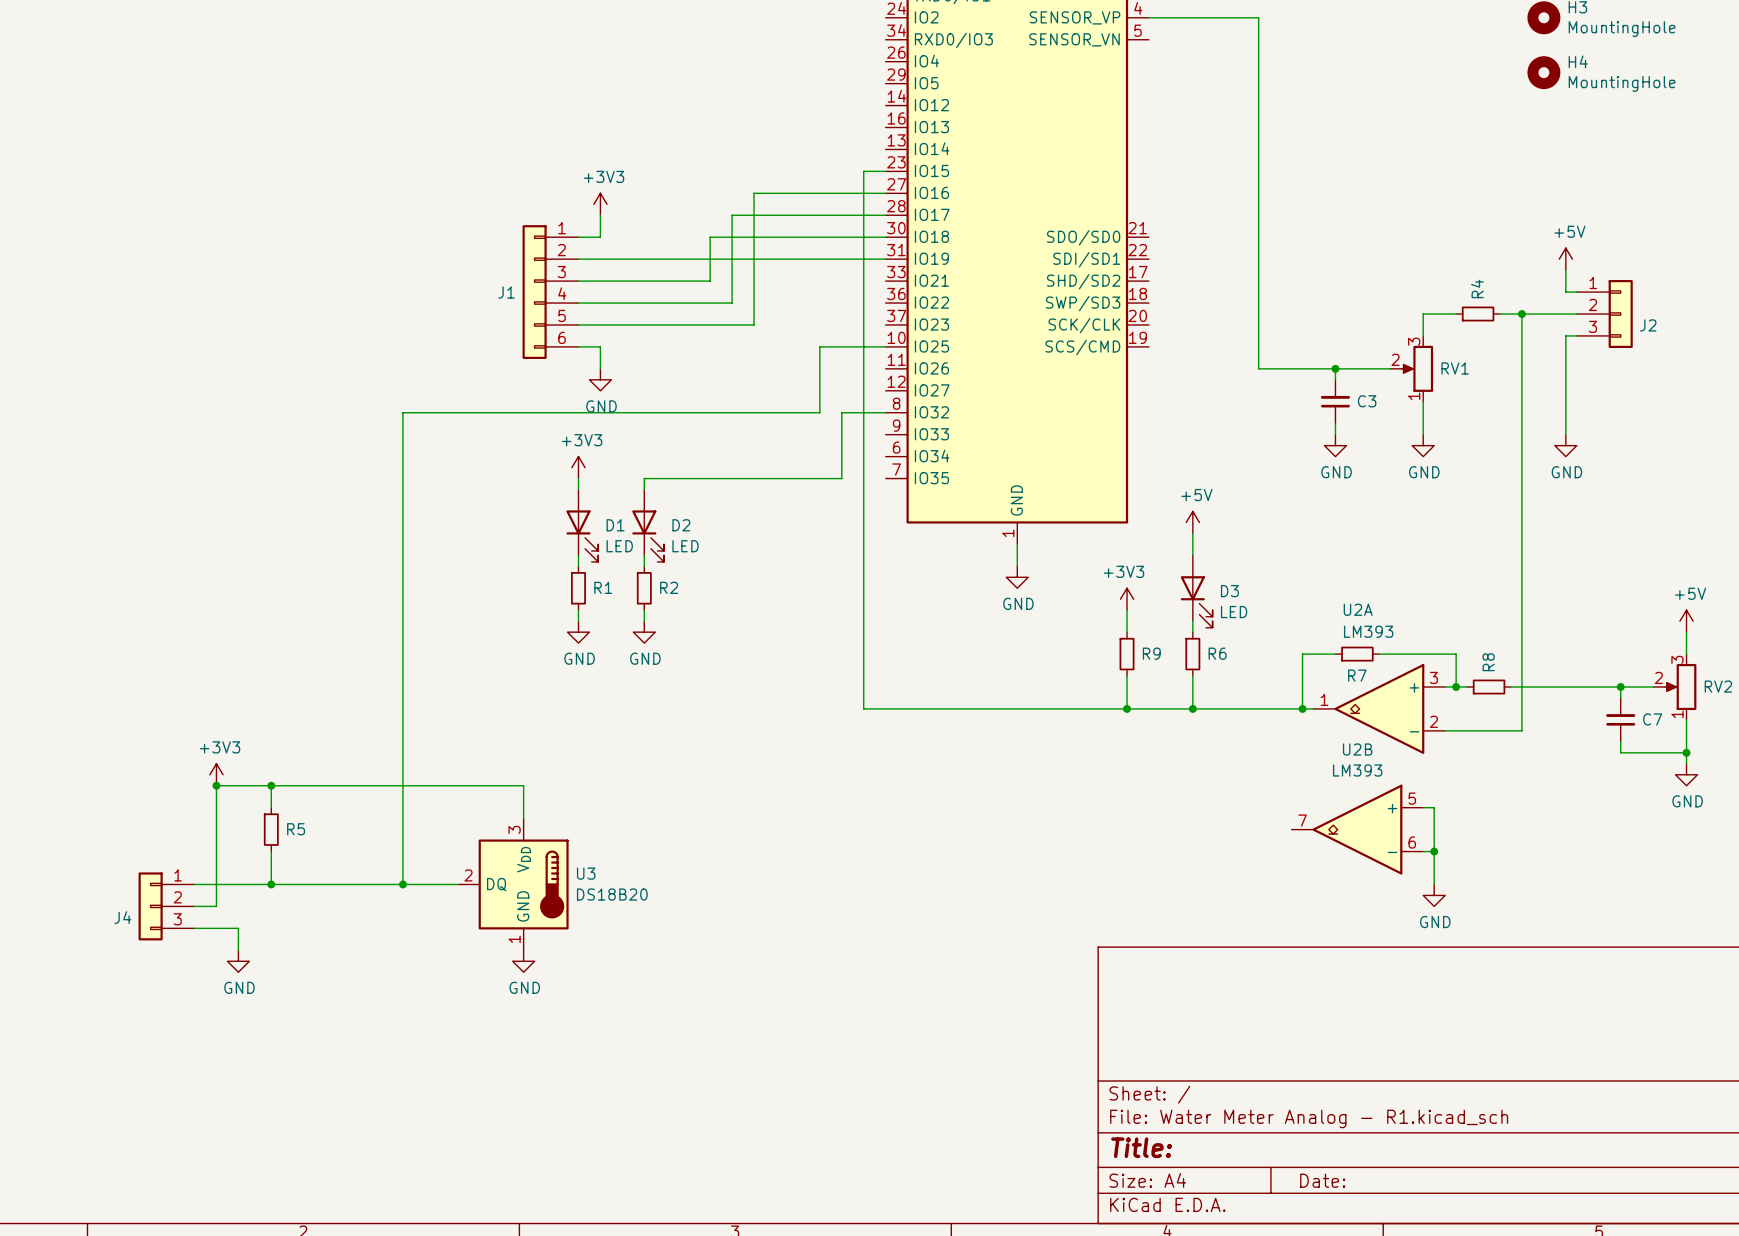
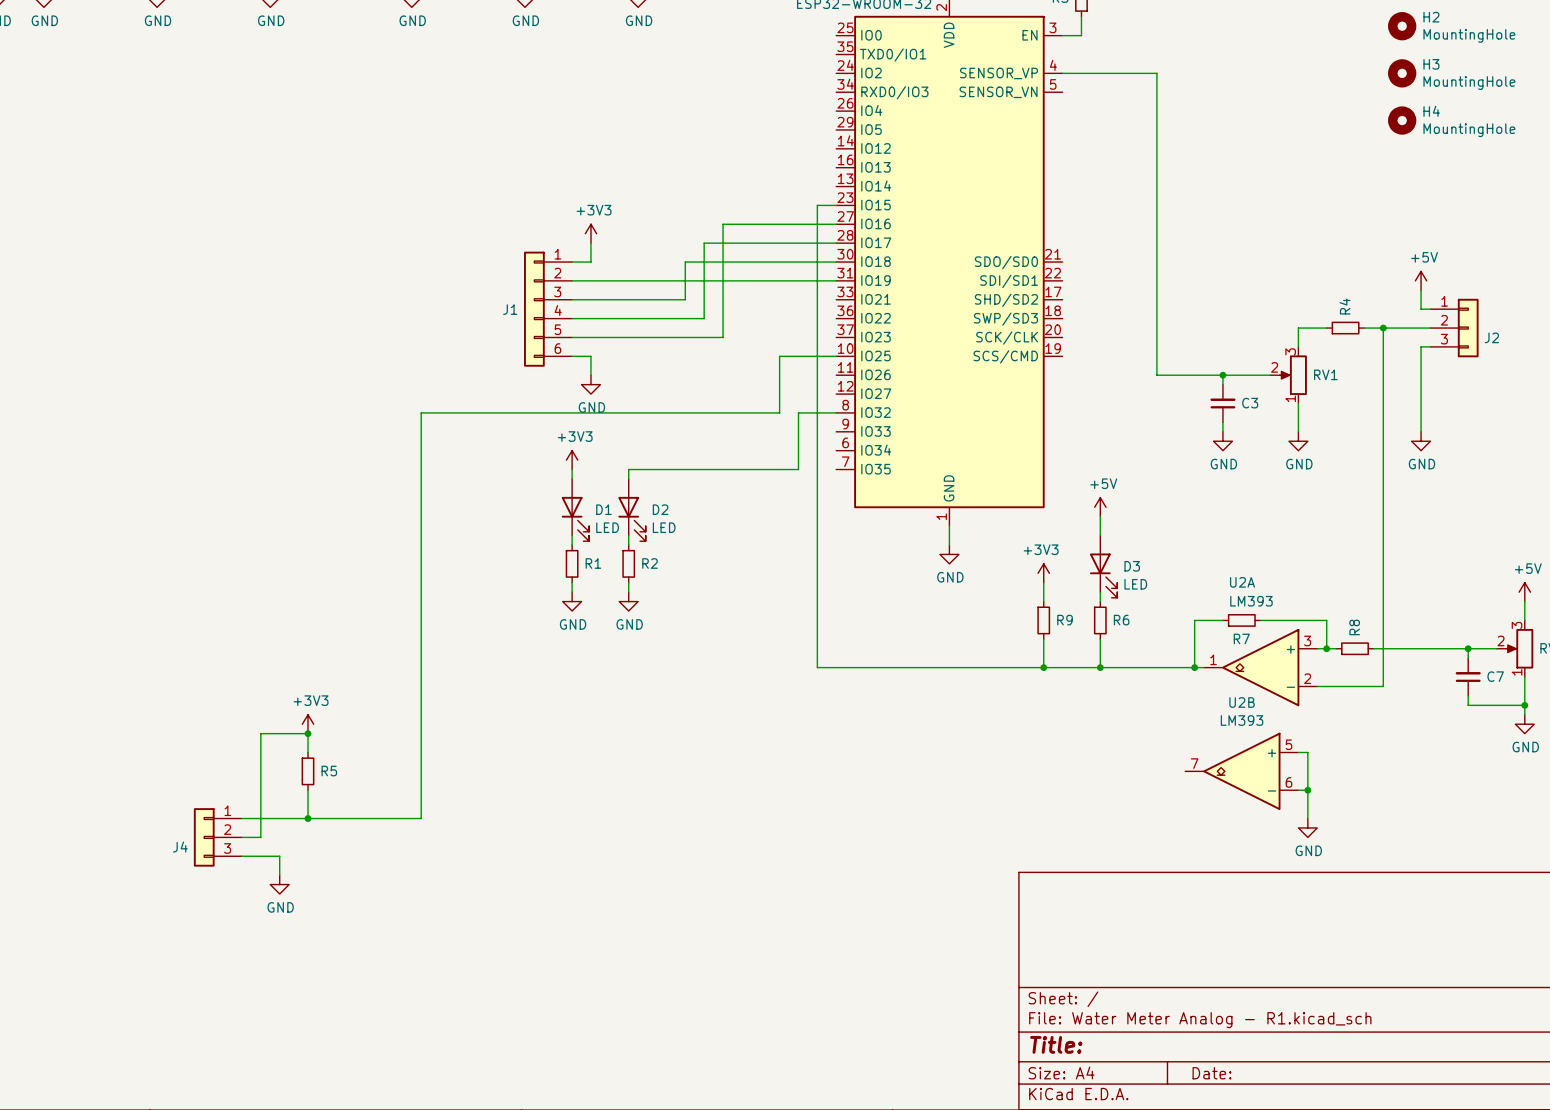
power symbol position: +3V3 (216, 774) -> +3V3 (308, 724)
junction: (216, 785) -> none
wire: (271, 785) (523, 785) (523, 818) -> none
wire: (402, 884) (457, 884) -> none
junction: (402, 884) -> none
U3: DS18B20 (513, 884) -> none
power symbol: GND (523, 961) -> none

